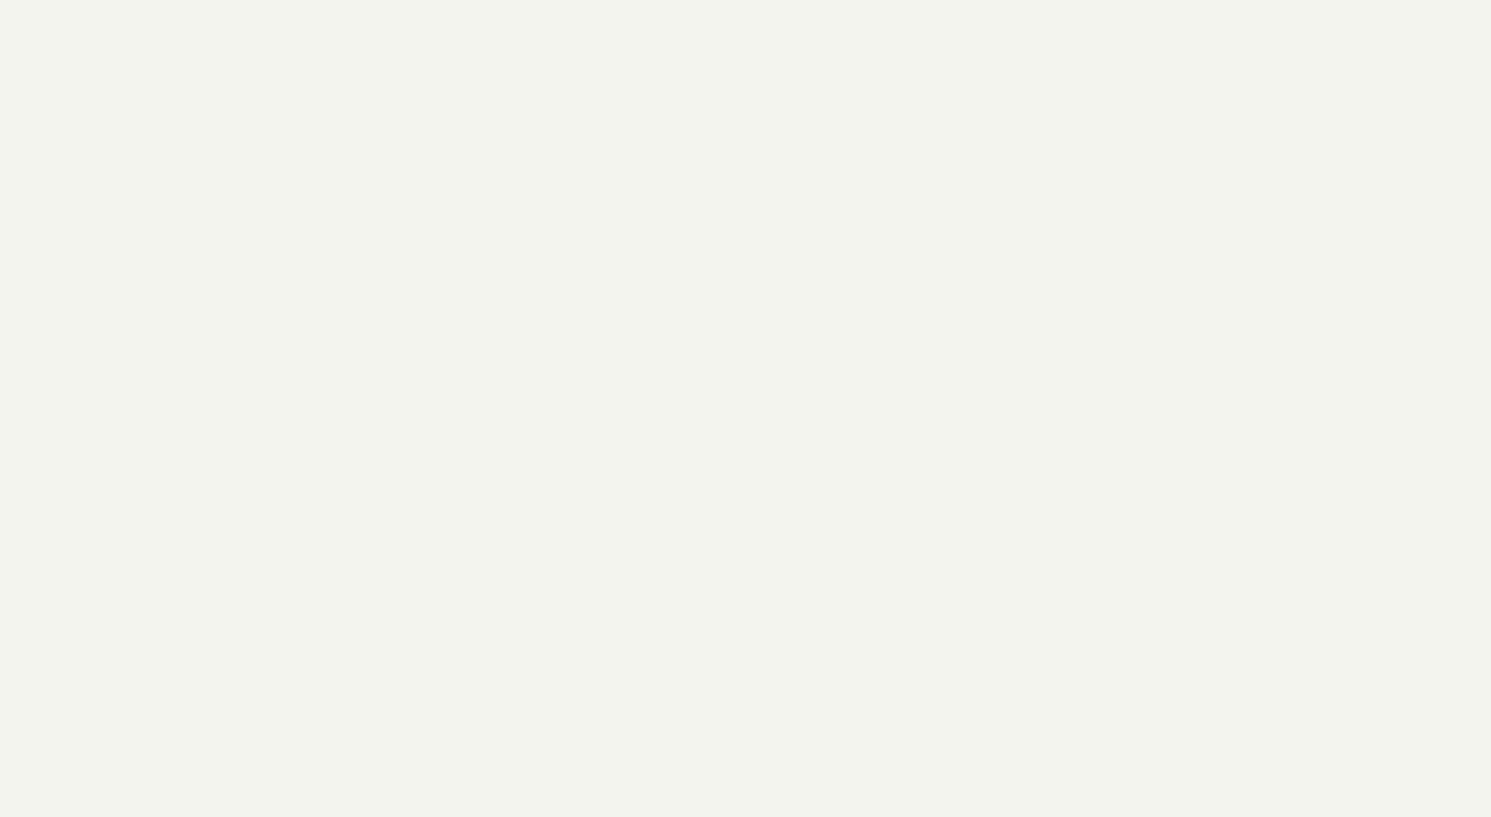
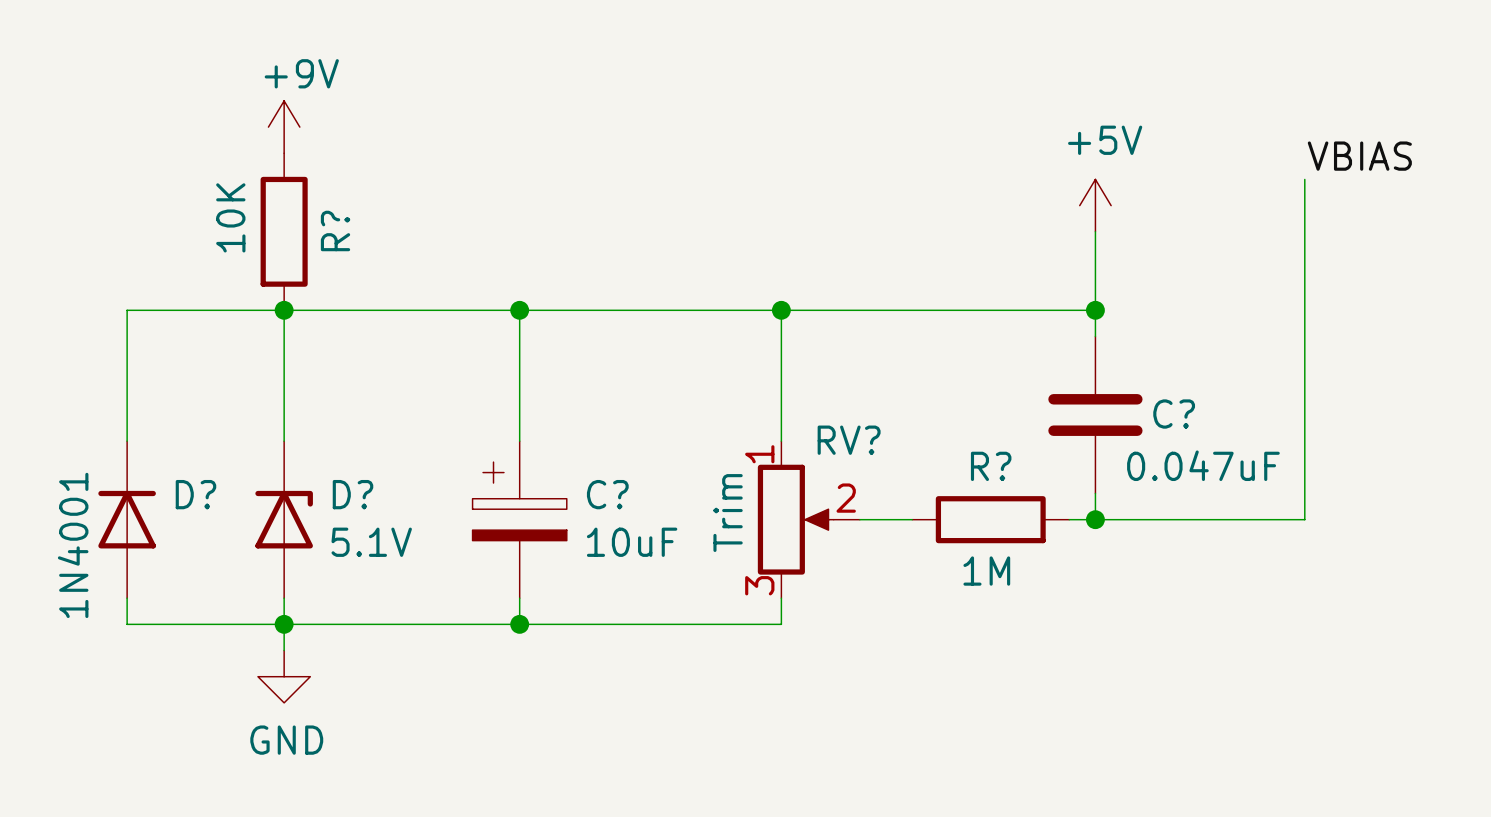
power symbol: none -> +9V (284, 127)
label: none -> VBIAS (1359, 156)
wire: none -> (1304, 179) (1304, 519) (1069, 519)
power symbol: none -> +5V (1095, 205)
R?: none -> 10K (284, 231)
wire: none -> (1095, 231) (1095, 336)
wire: none -> (284, 310) (284, 441)
junction: none -> (284, 310)
wire: none -> (519, 310) (519, 441)
junction: none -> (519, 310)
wire: none -> (781, 310) (781, 441)
junction: none -> (781, 310)
wire: none -> (1095, 310) (127, 310) (127, 441)
junction: none -> (1095, 310)
C?: none -> 0.047uF (1095, 414)
wire: none -> (1095, 493) (1095, 519)
D?: none -> 1N4001 (127, 519)
D?: none -> 5.1V (284, 519)
C?: none -> 10uF (519, 519)
RV?: none -> Trim (808, 519)
wire: none -> (859, 519) (912, 519)
R?: none -> 1M (990, 519)
junction: none -> (1095, 519)
wire: none -> (127, 598) (127, 624) (781, 624) (781, 598)
wire: none -> (284, 598) (284, 650)
wire: none -> (519, 598) (519, 624)
junction: none -> (284, 624)
junction: none -> (519, 624)
power symbol: none -> GND (284, 676)

